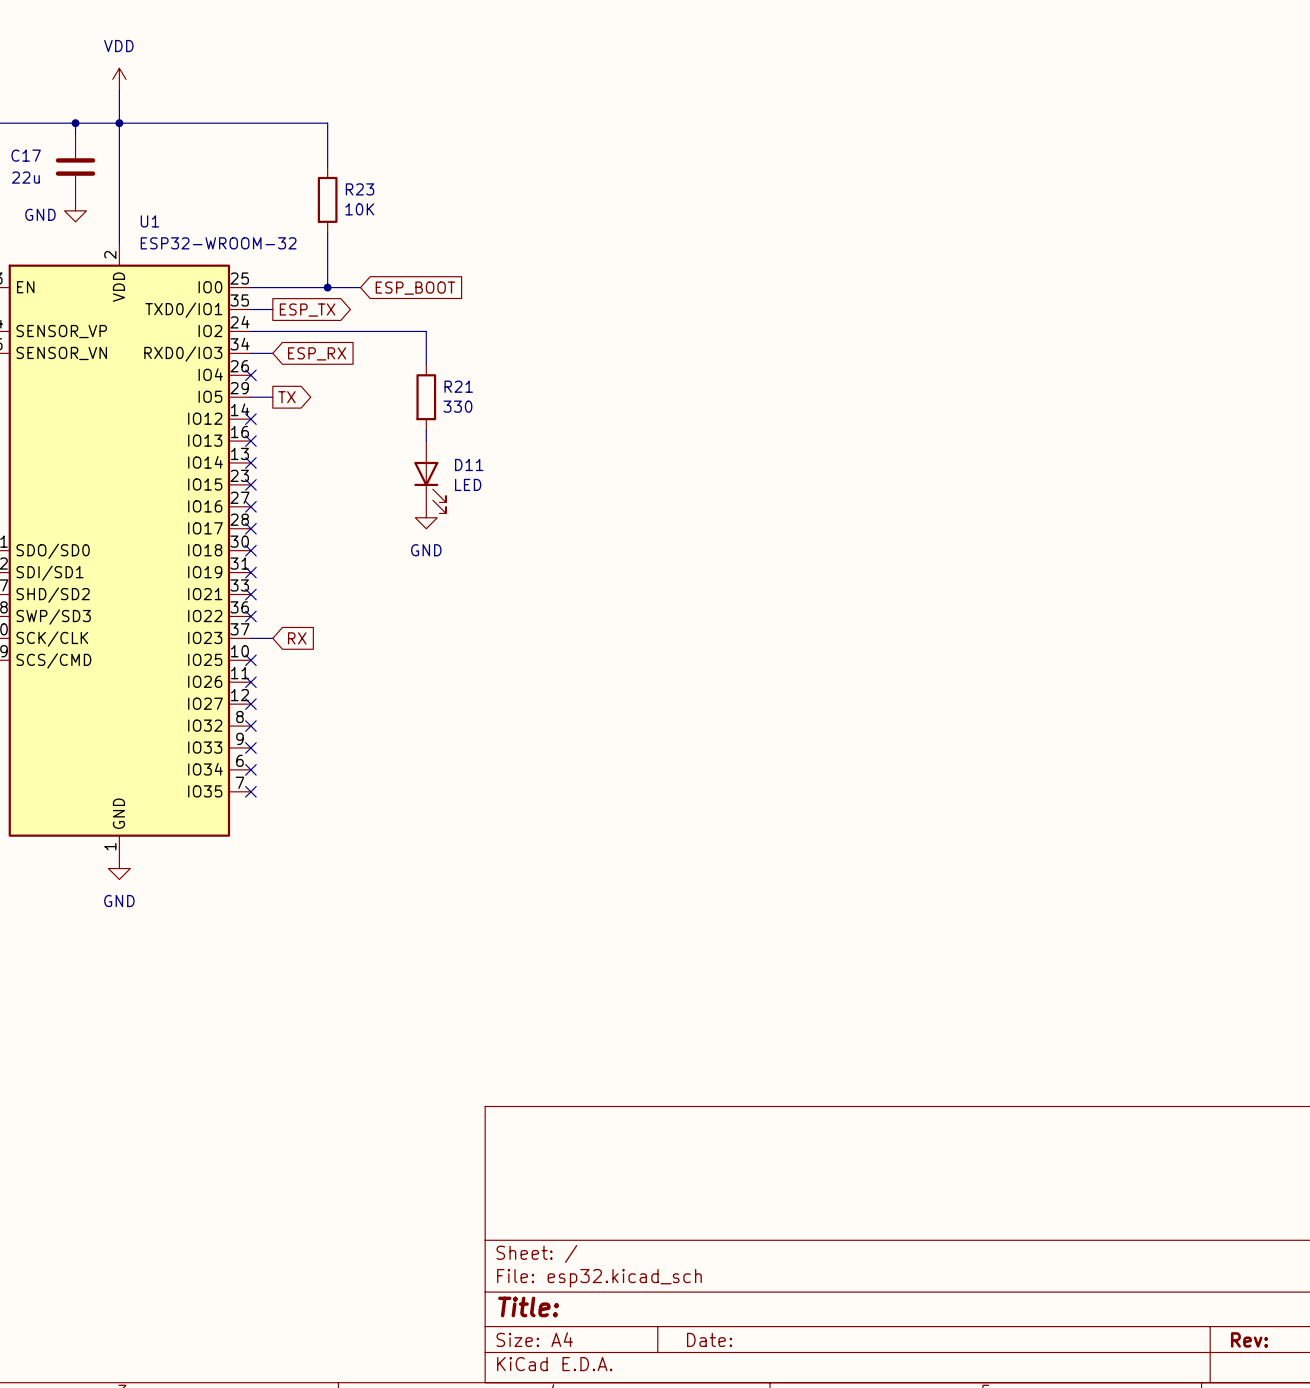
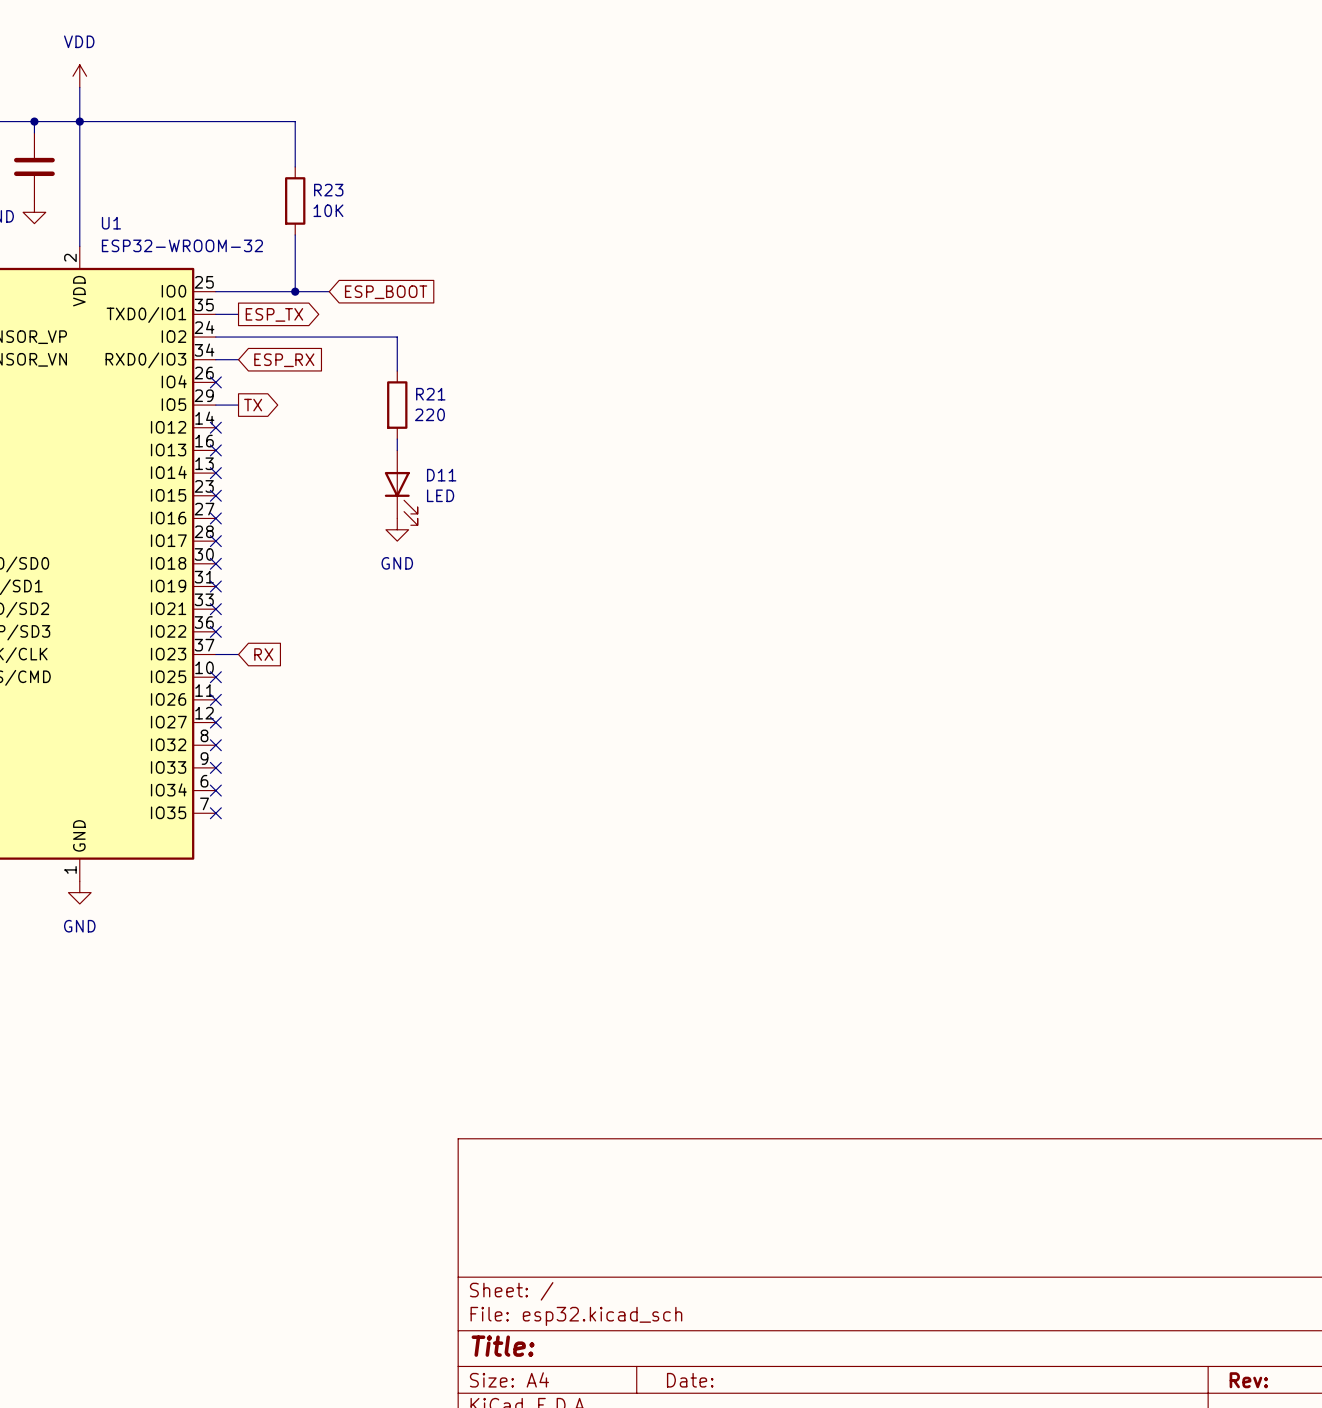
R21 value: 330 (457, 406) -> 220 (429, 414)

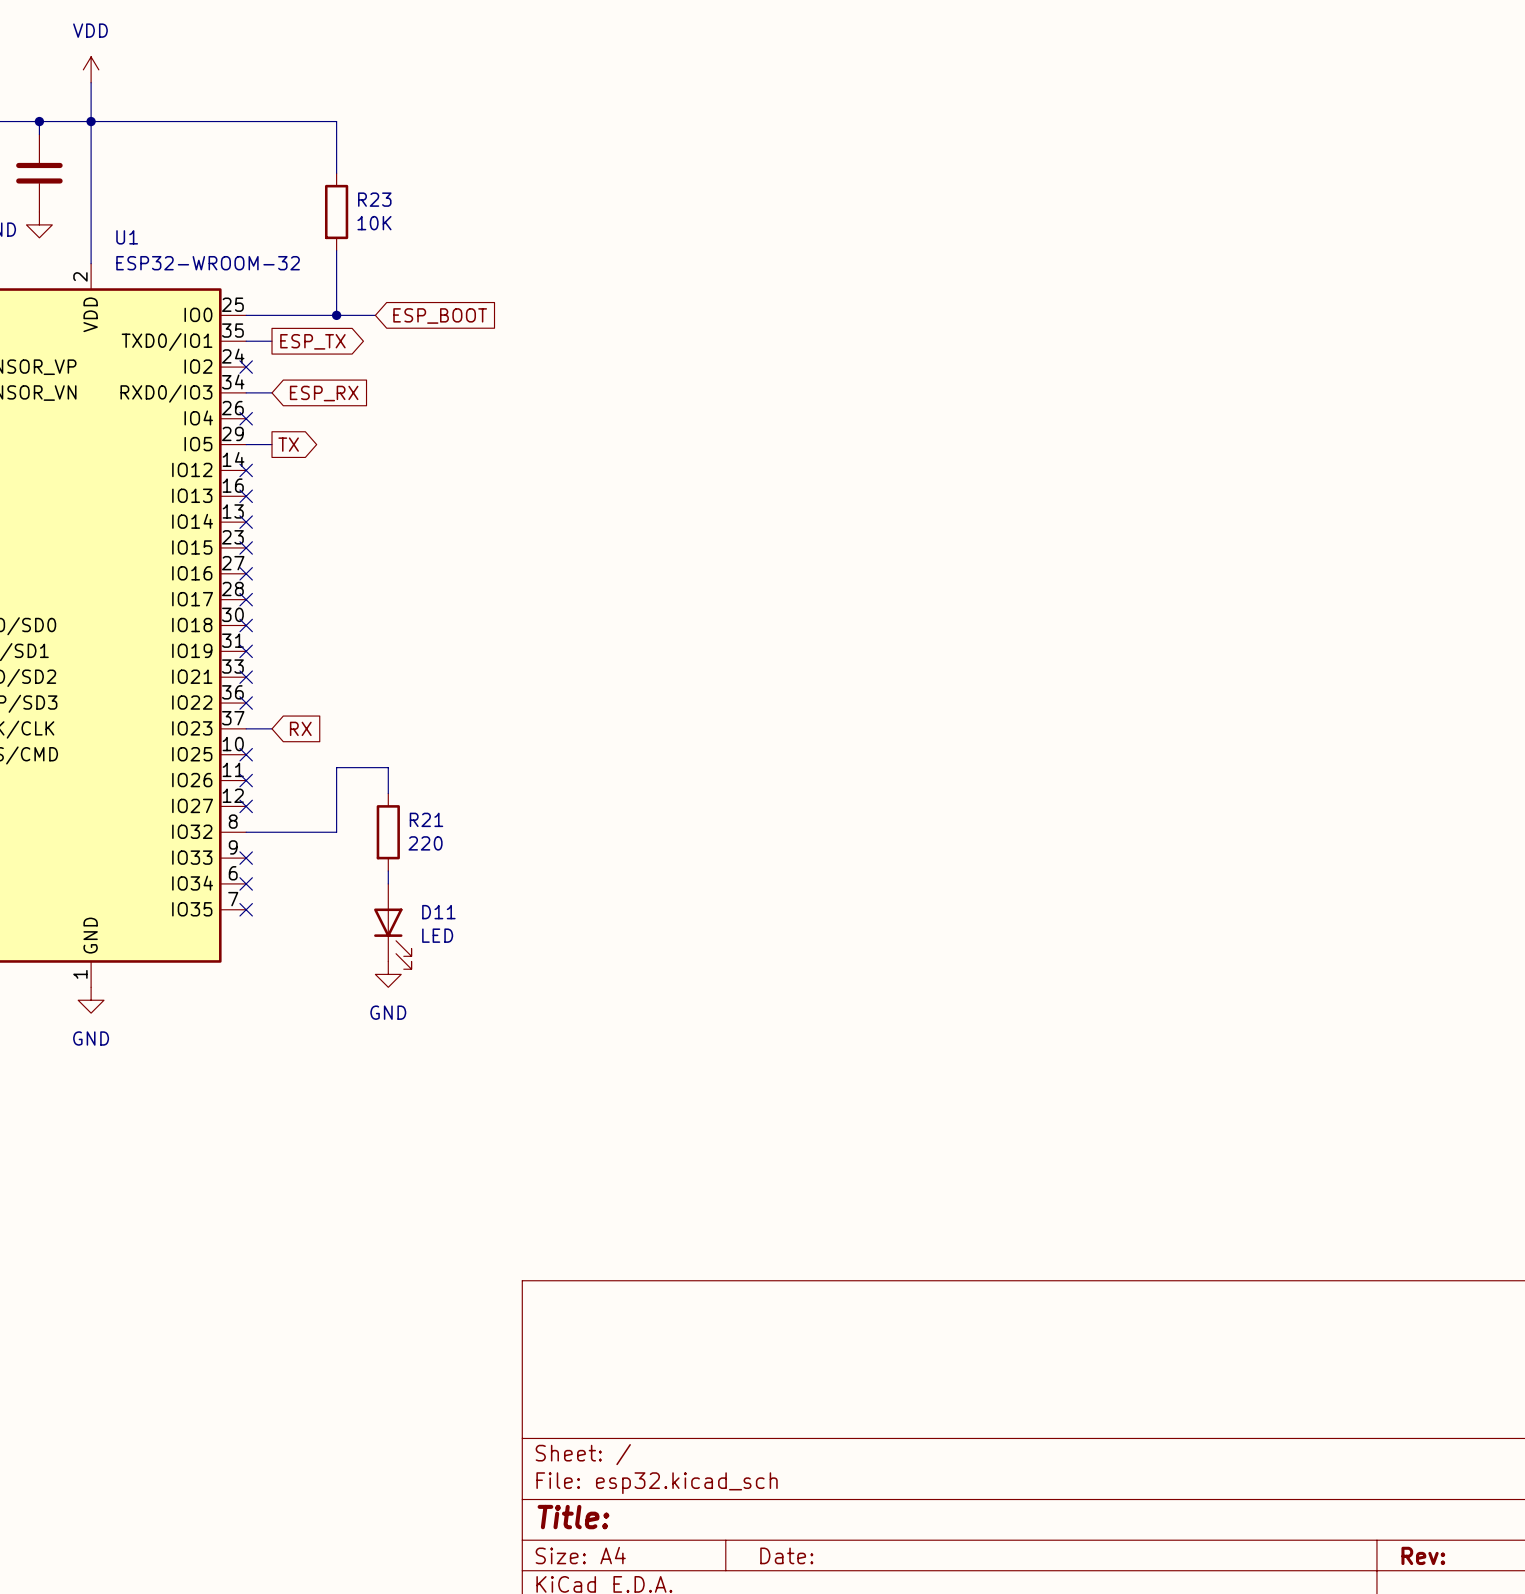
wire: (215, 337) (397, 337) (397, 371) -> none
no-connect mark: none -> (246, 367)
R21 position: (397, 405) -> (388, 832)
wire: (397, 439) (397, 450) -> none
D11 position: (401, 487) -> (392, 926)
power symbol: GND (397, 529) -> none
wire: none -> (388, 793) (388, 767) (336, 767) (336, 832) (246, 832)
no-connect mark: (215, 745) -> none
wire: none -> (388, 871) (388, 883)
power symbol: none -> GND (388, 974)

